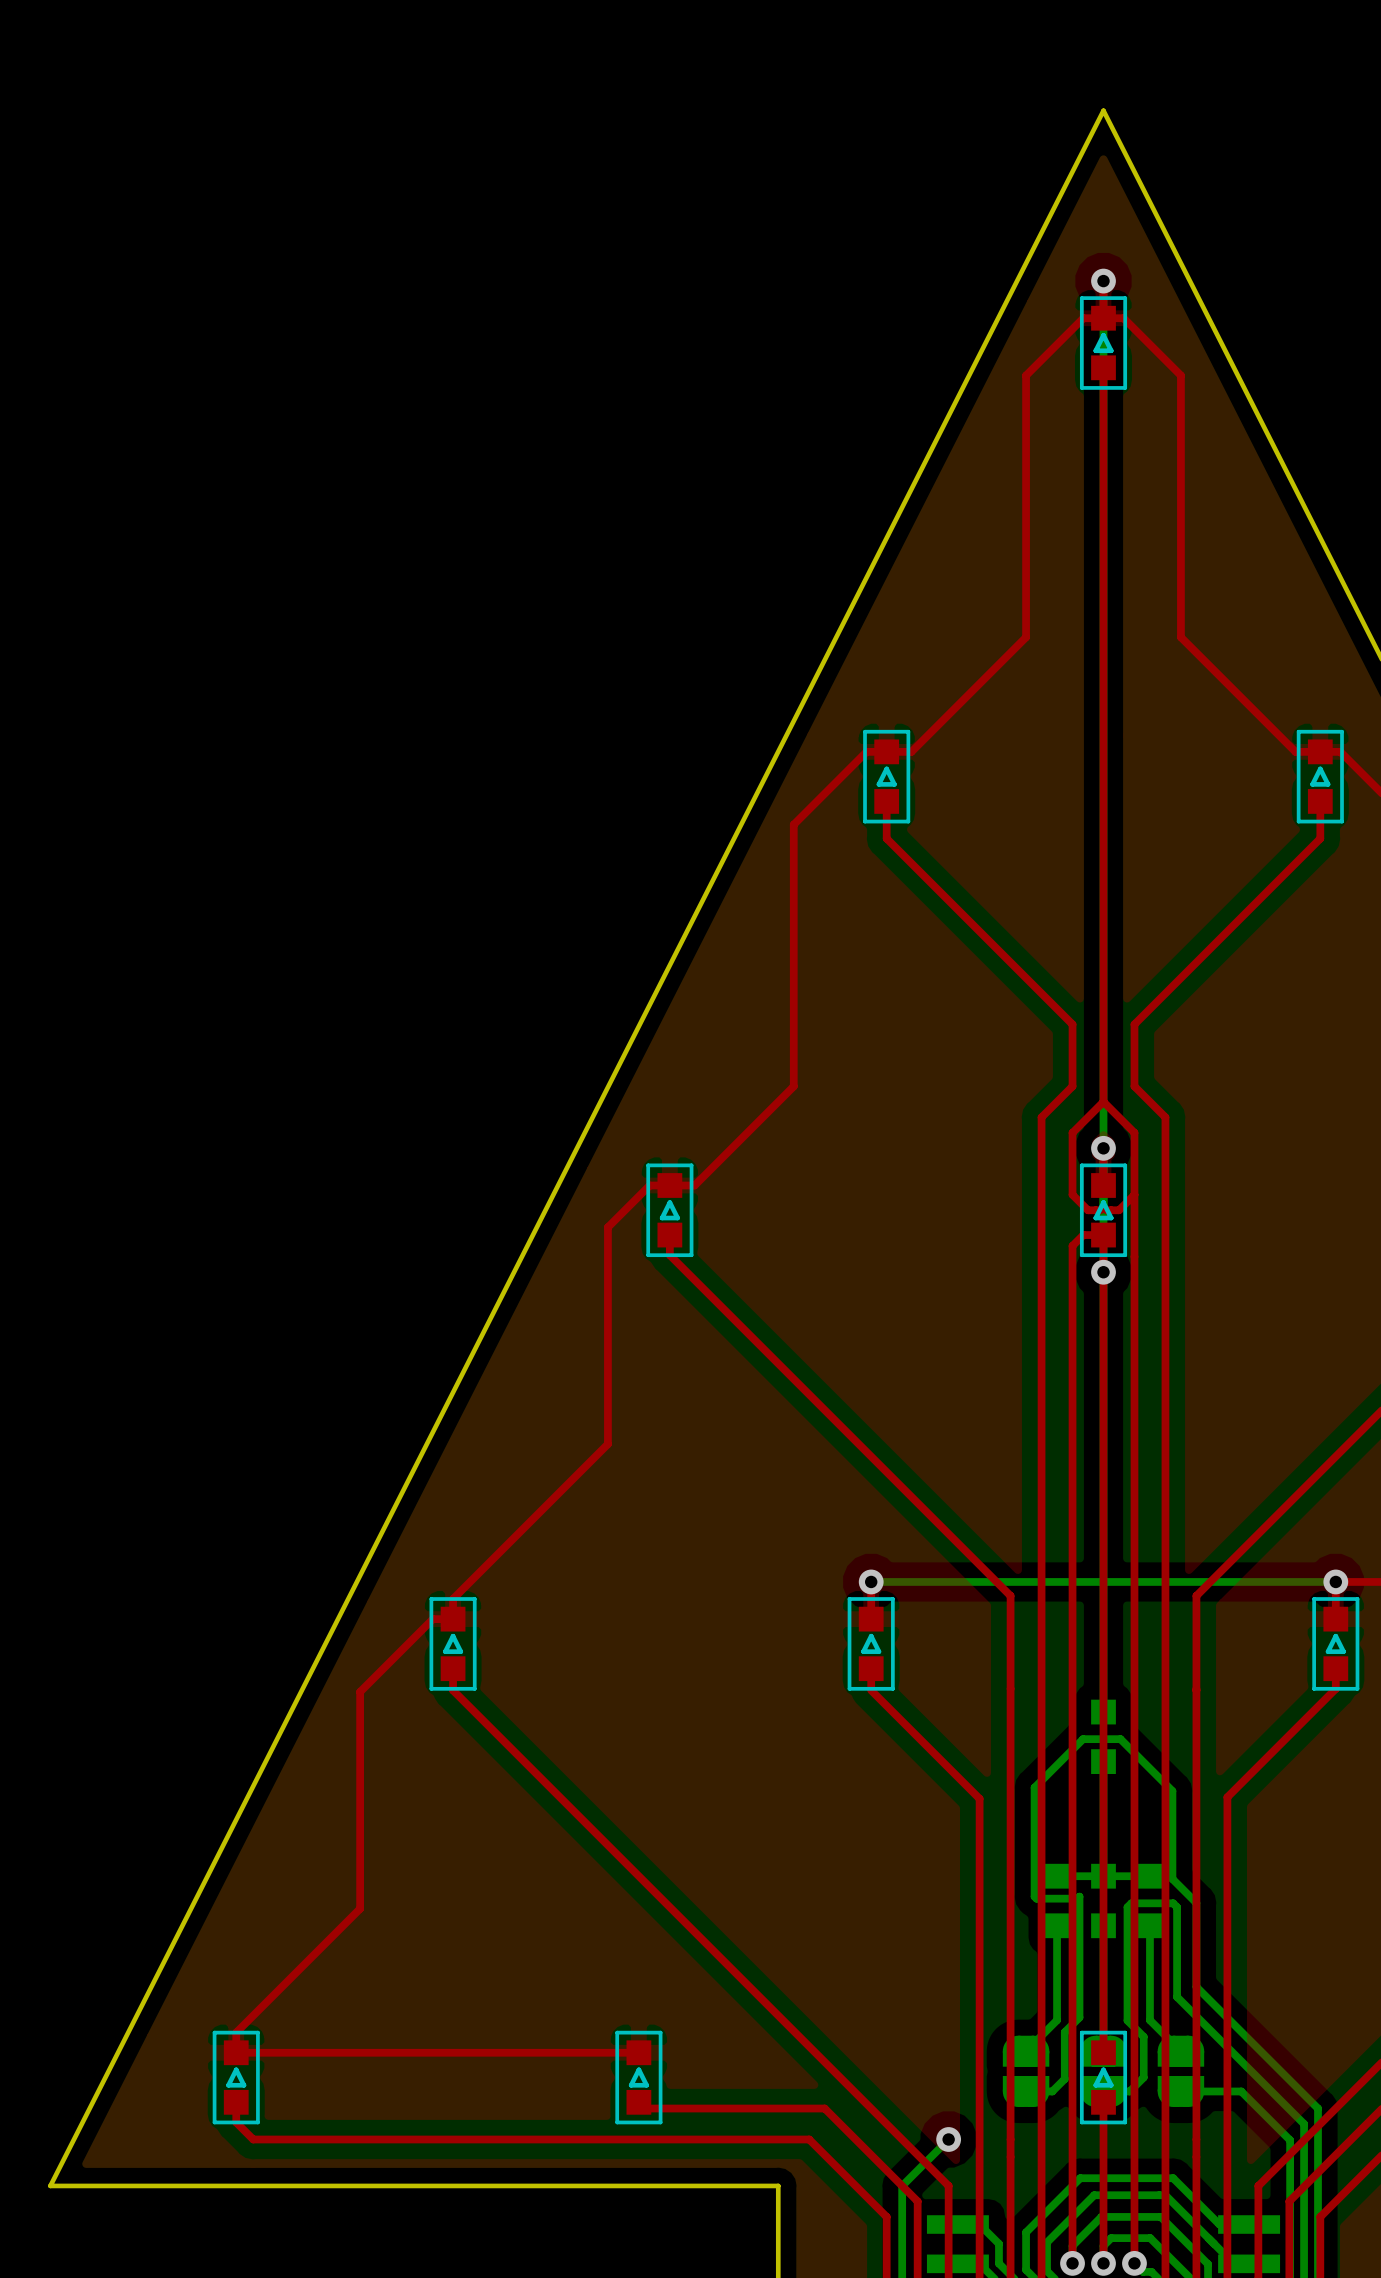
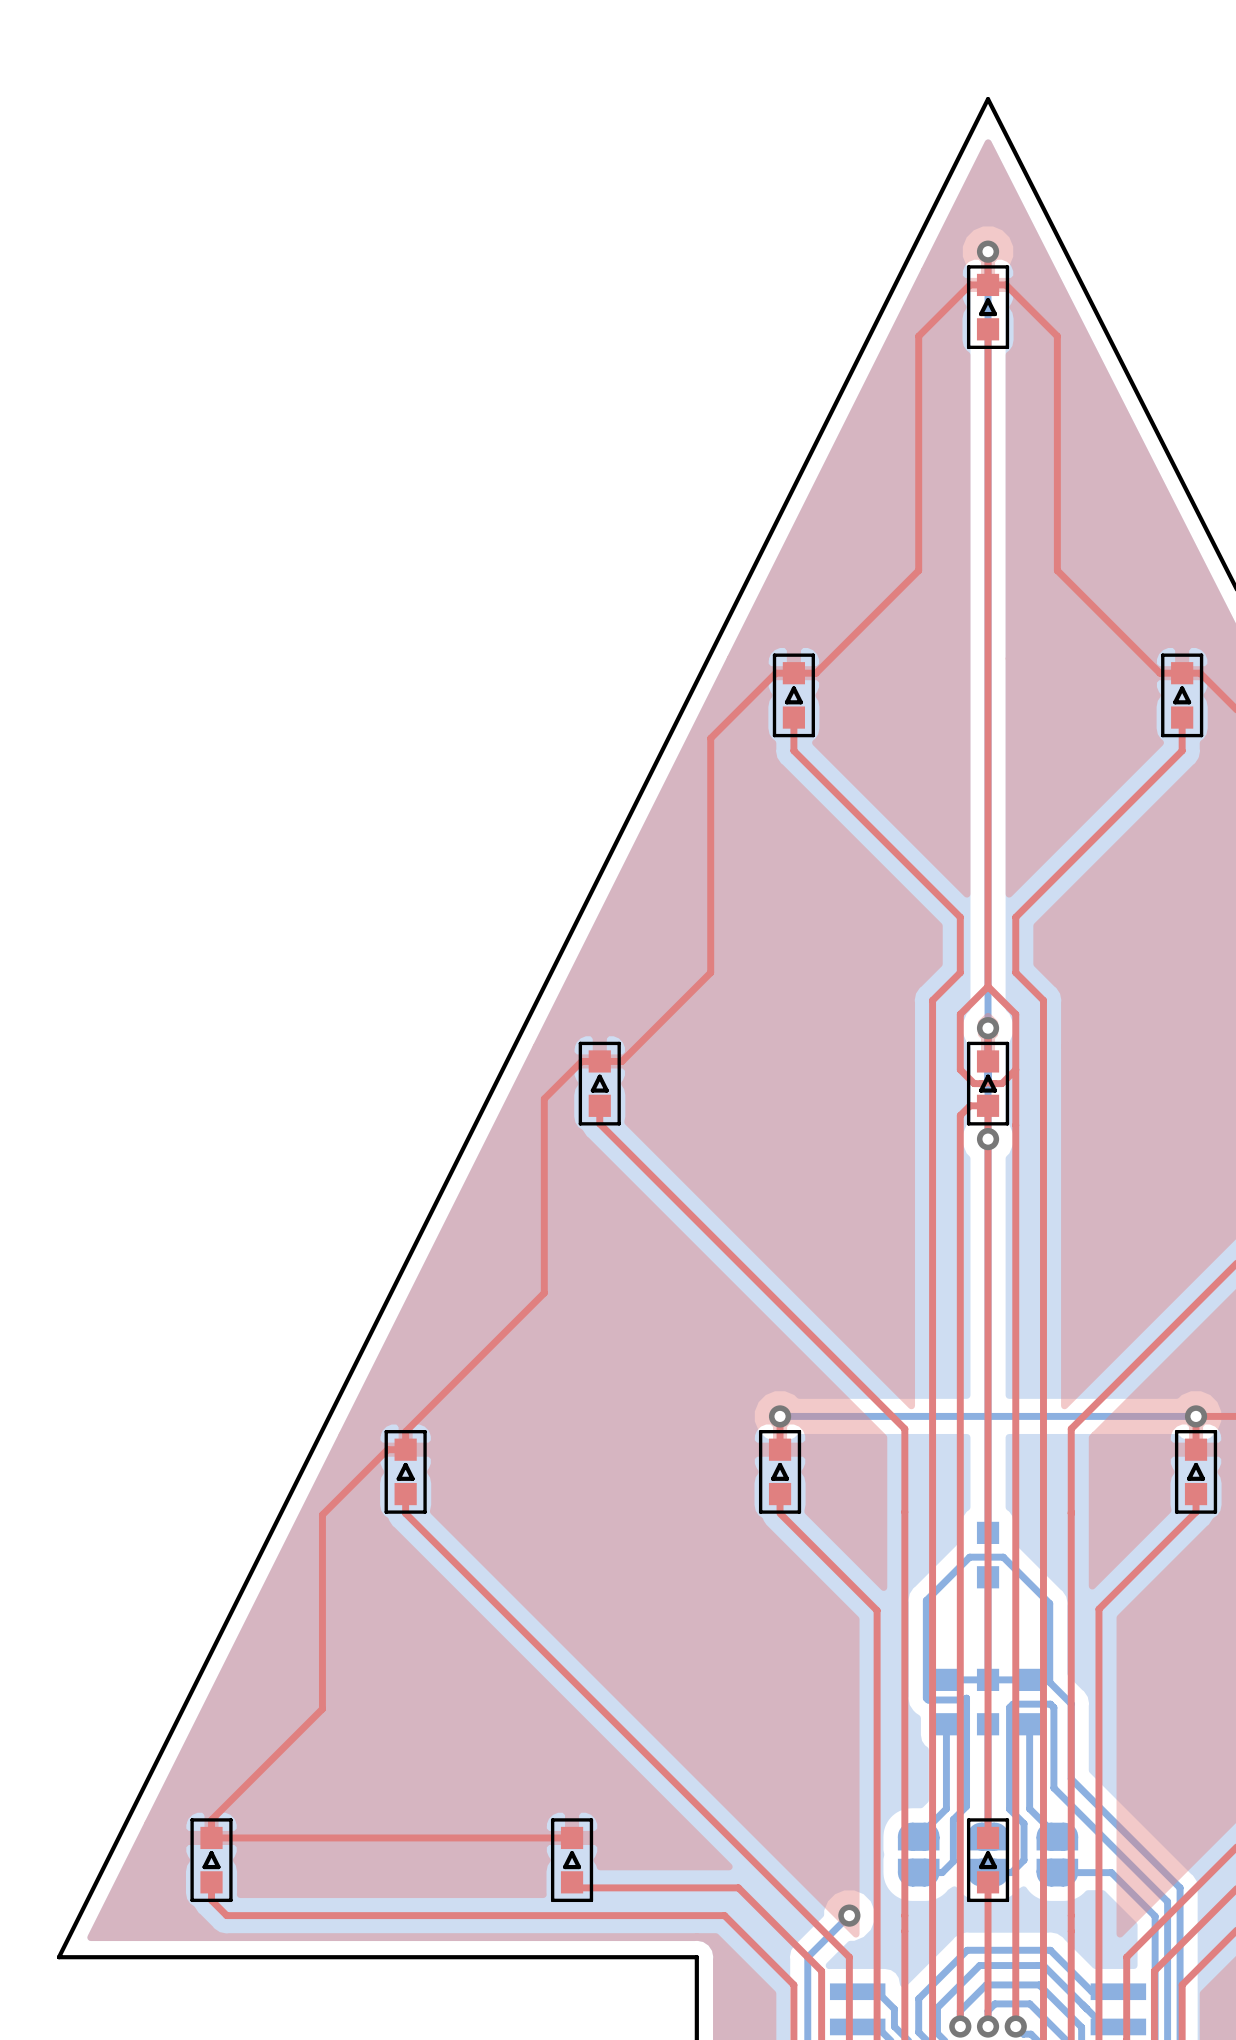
board edge: (1103, 110) (50, 2185) (65, 2185) -> (988, 99) (58, 1957)

